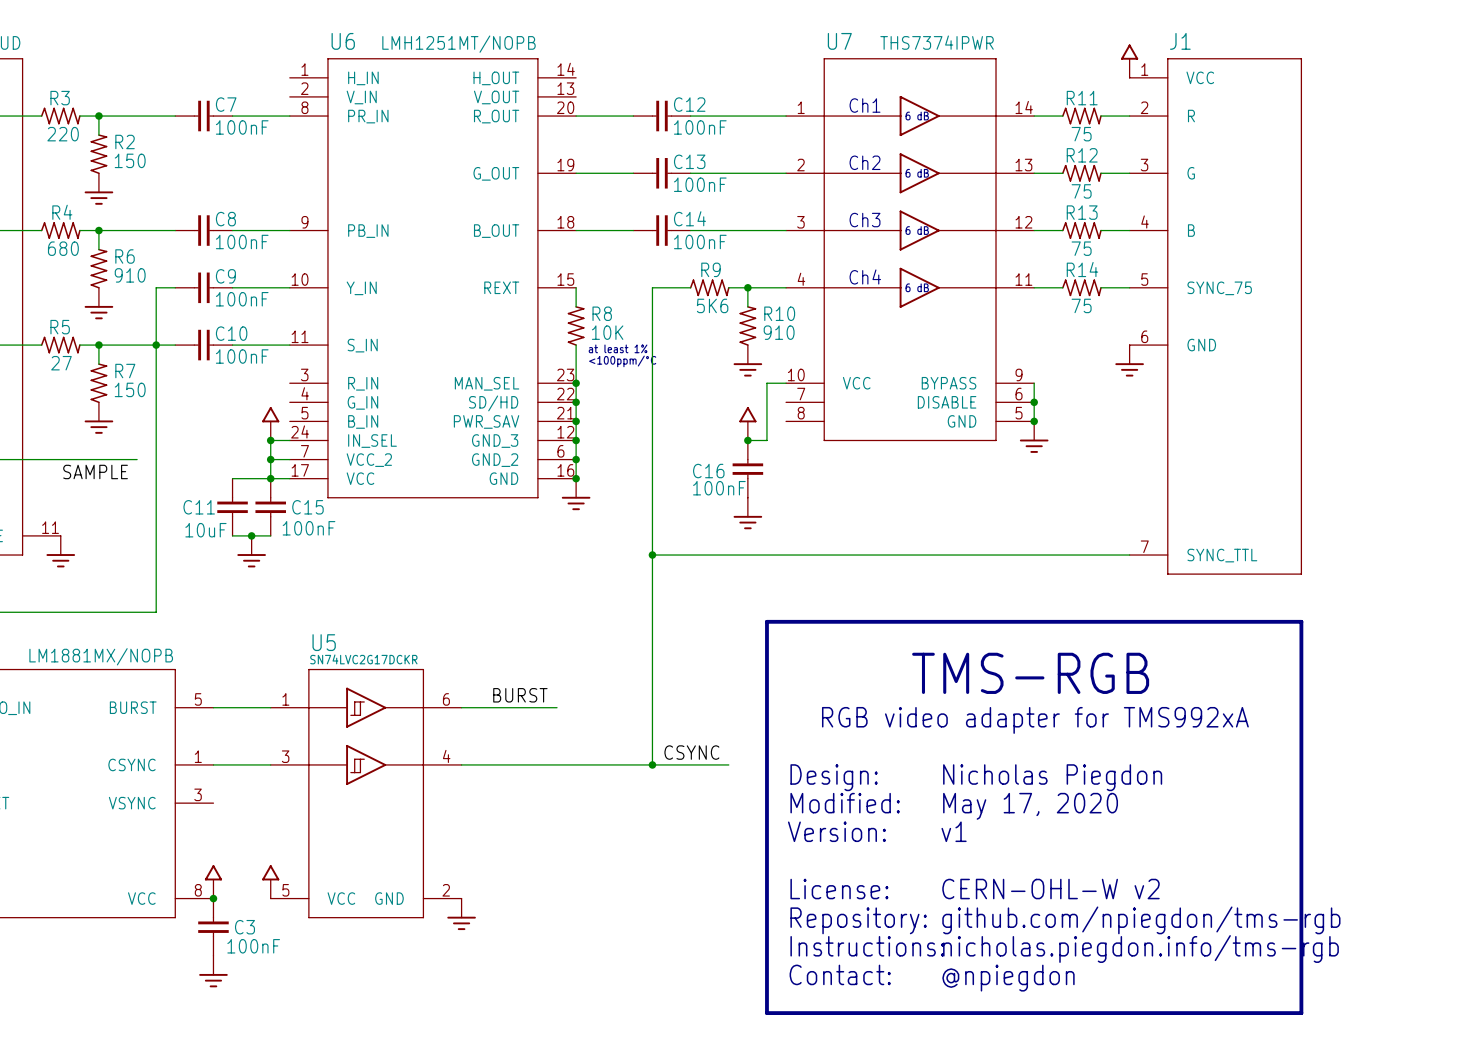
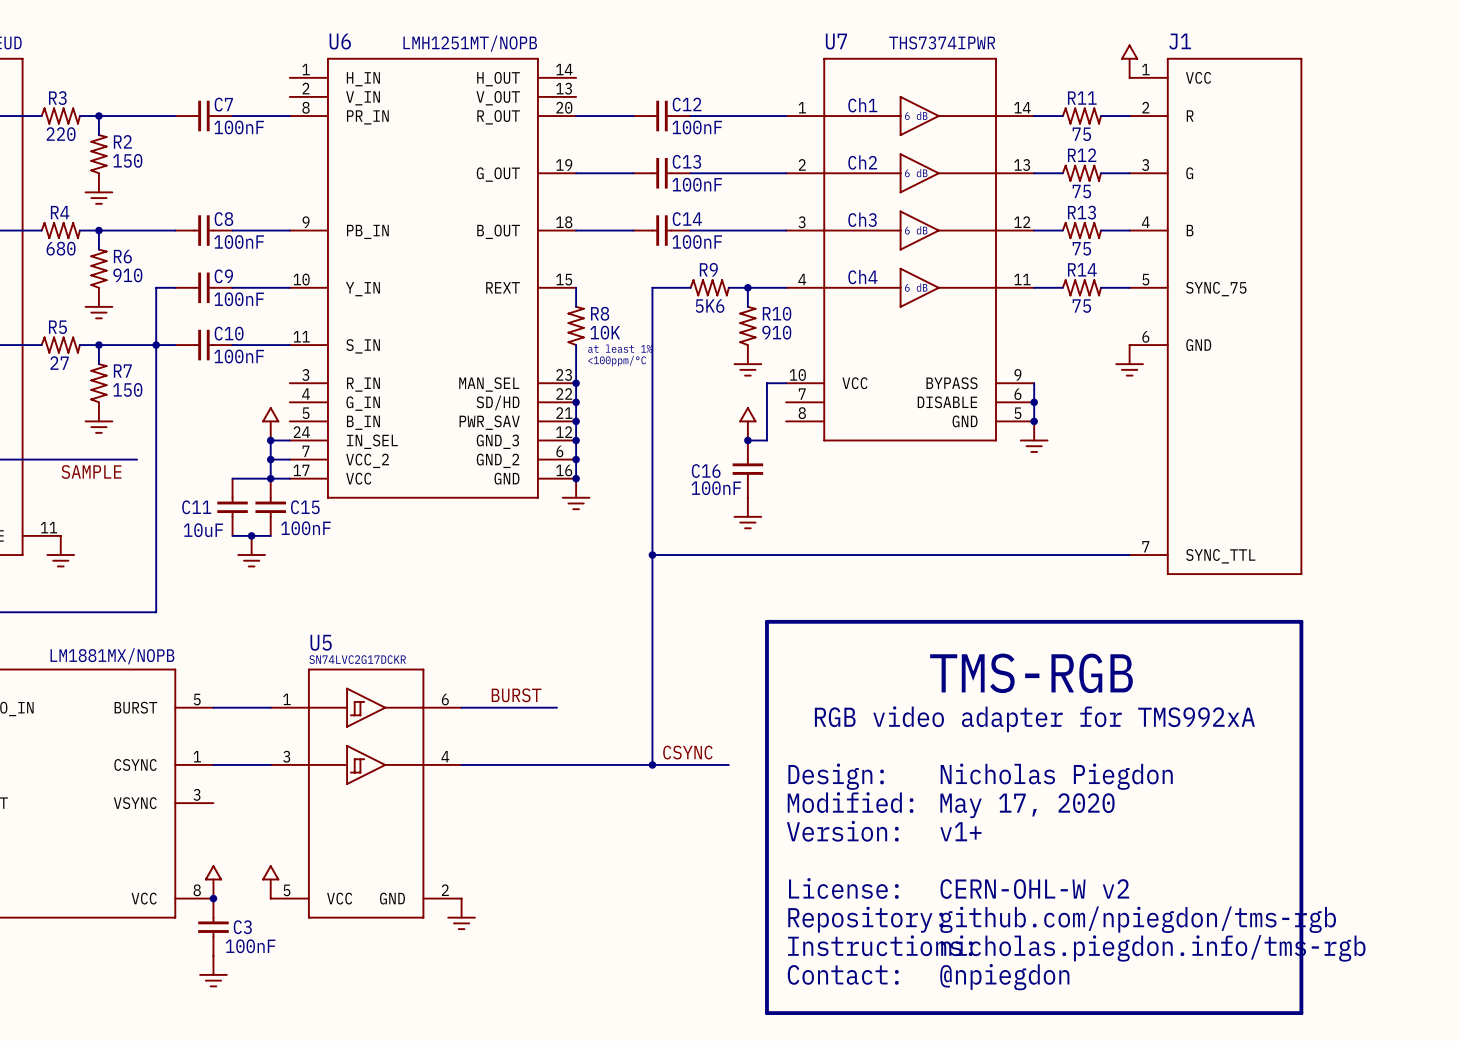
text: v1 (954, 831) -> v1+ (960, 831)

